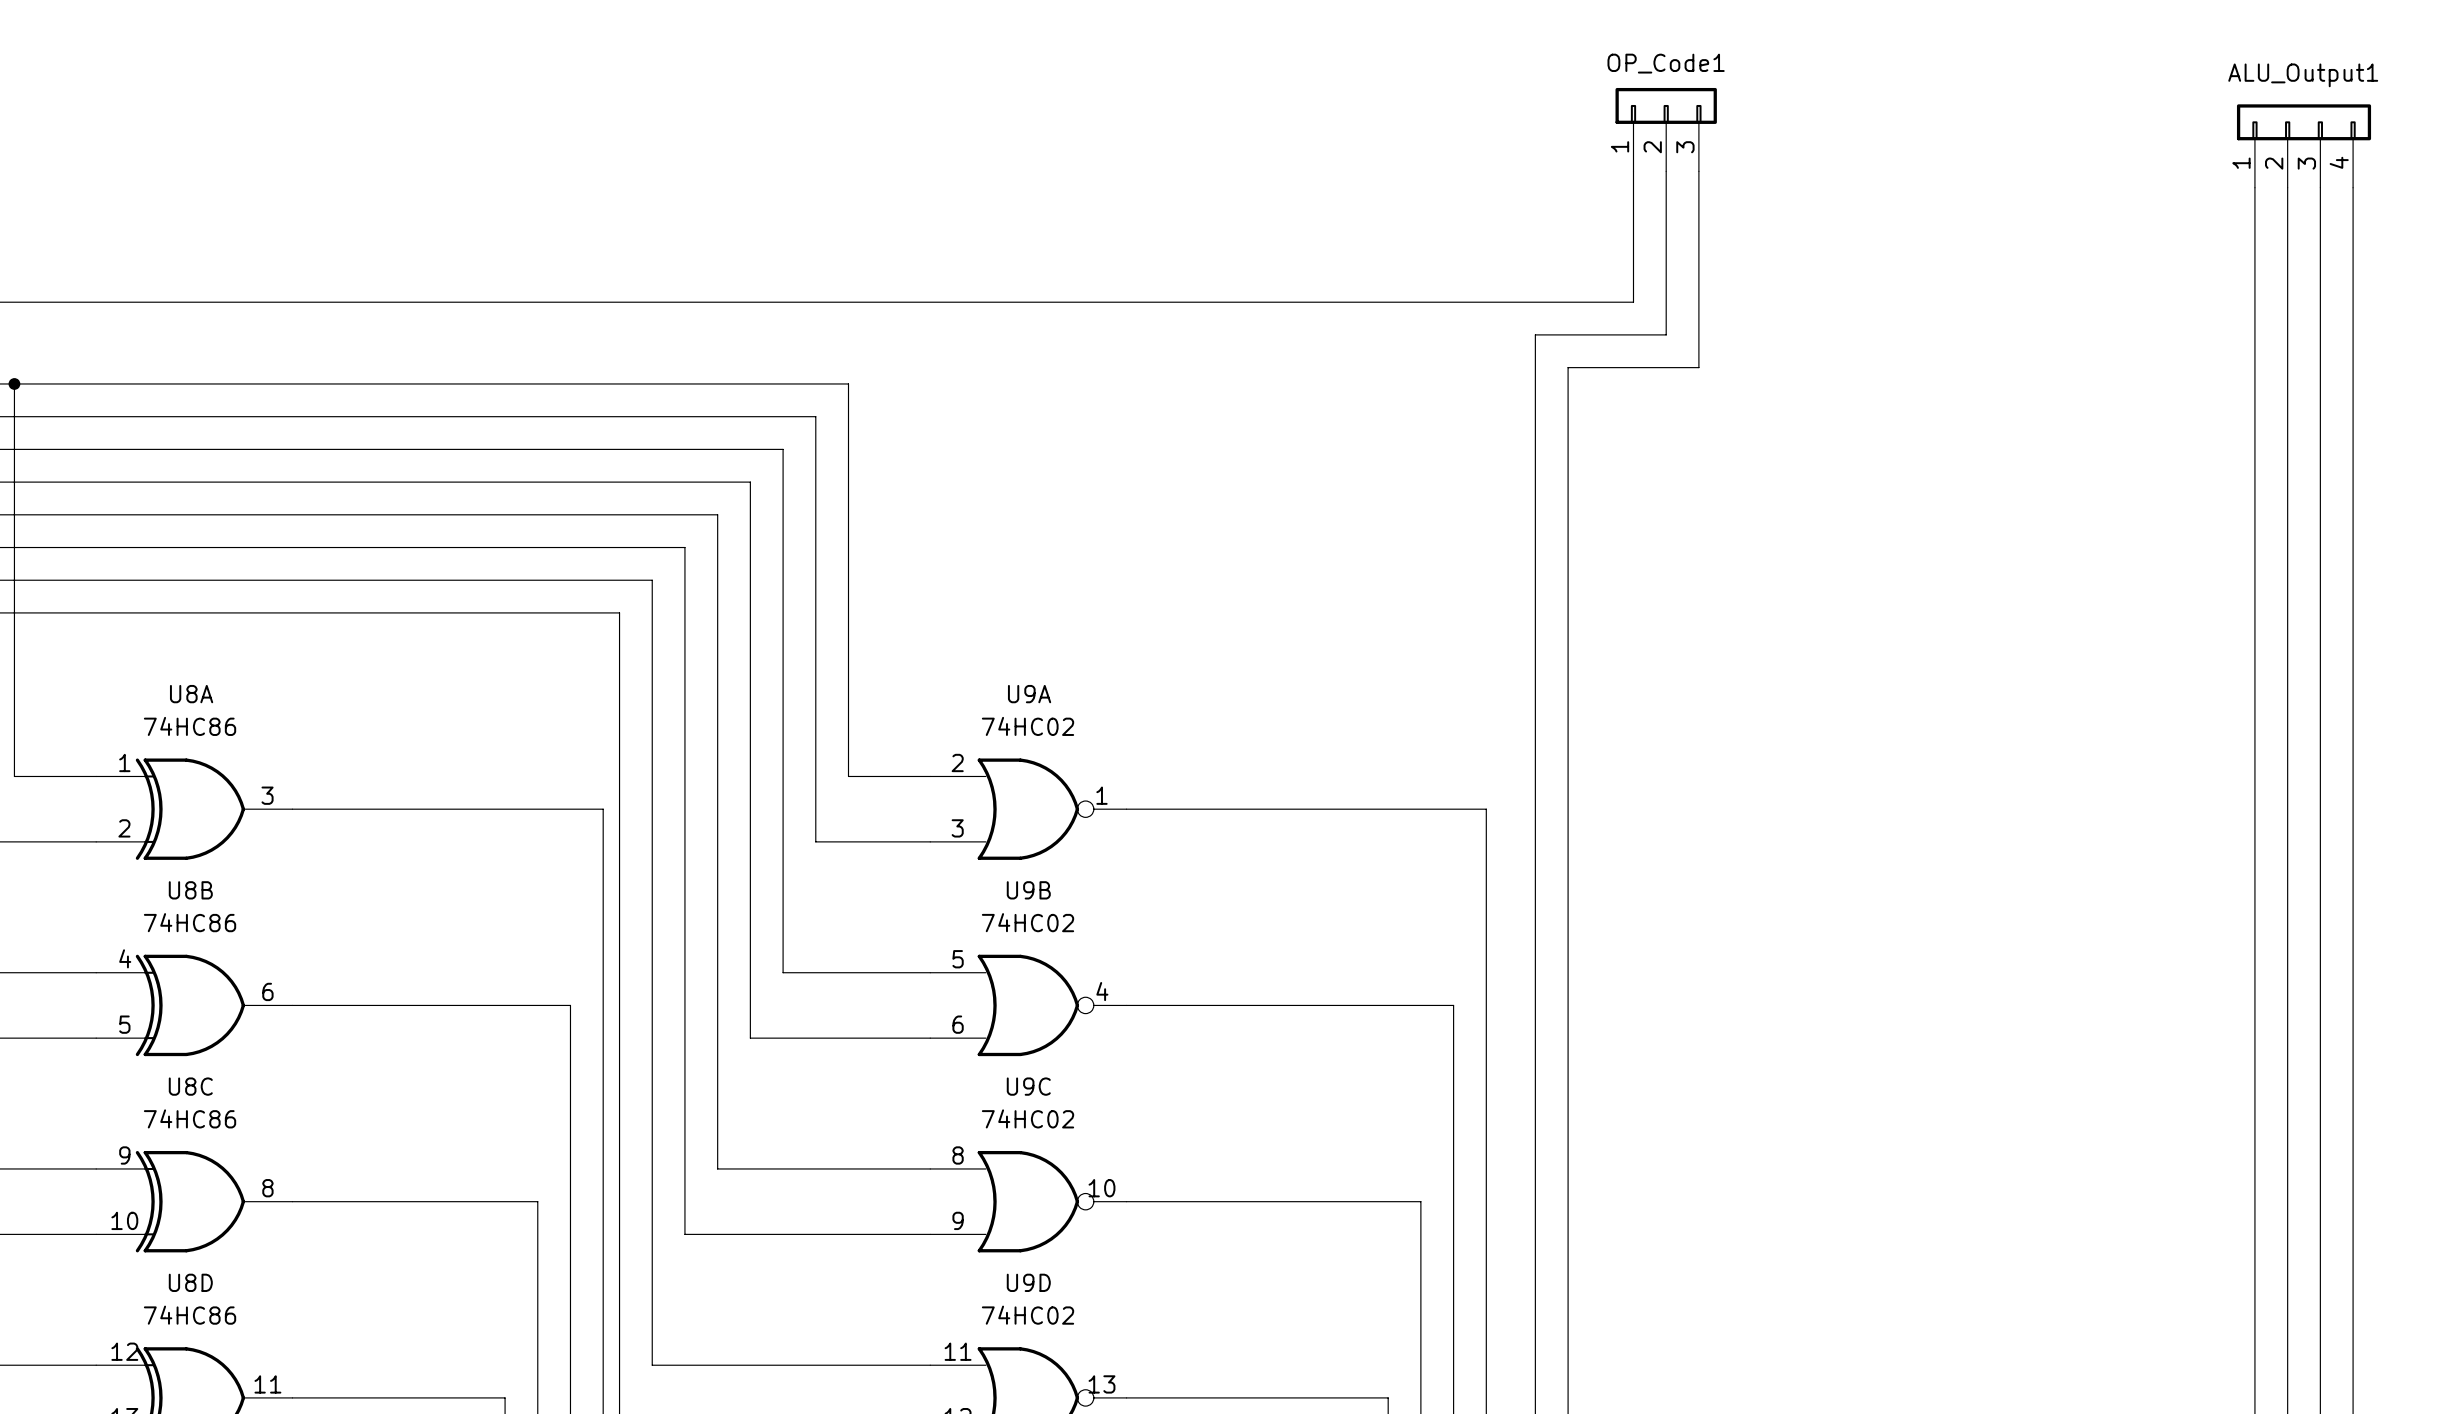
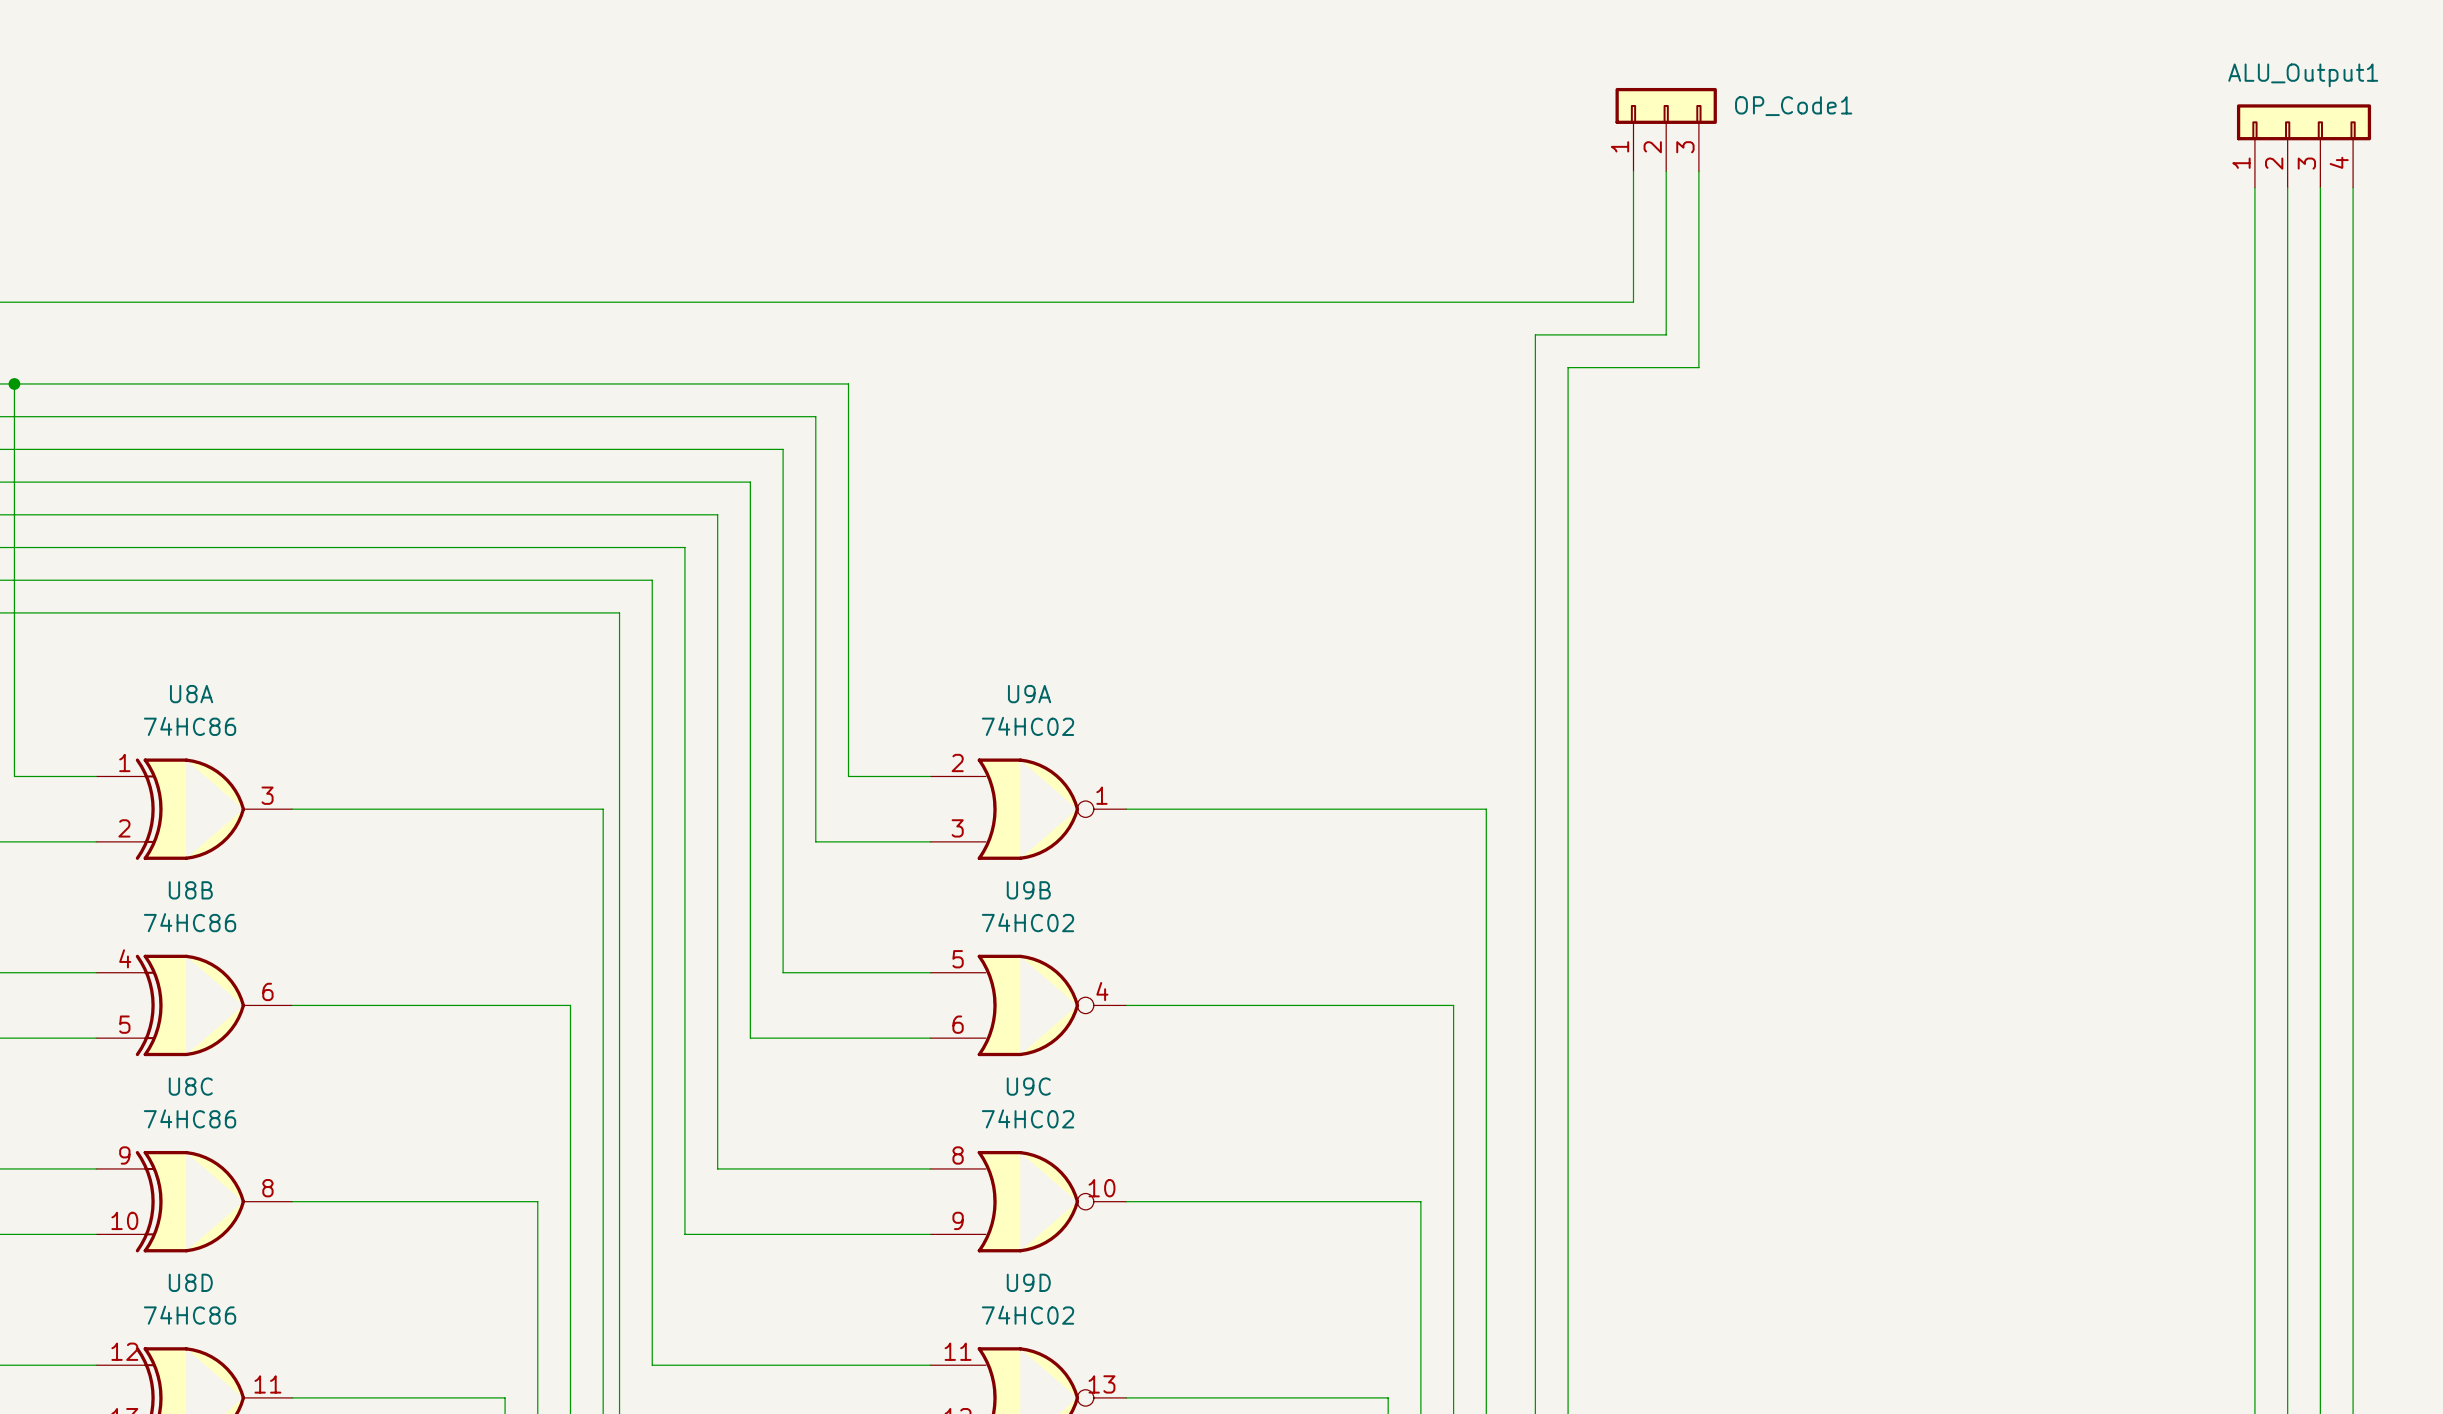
OP_Code1 name position: OP_Code1 (1666, 63) -> OP_Code1 (1793, 106)

